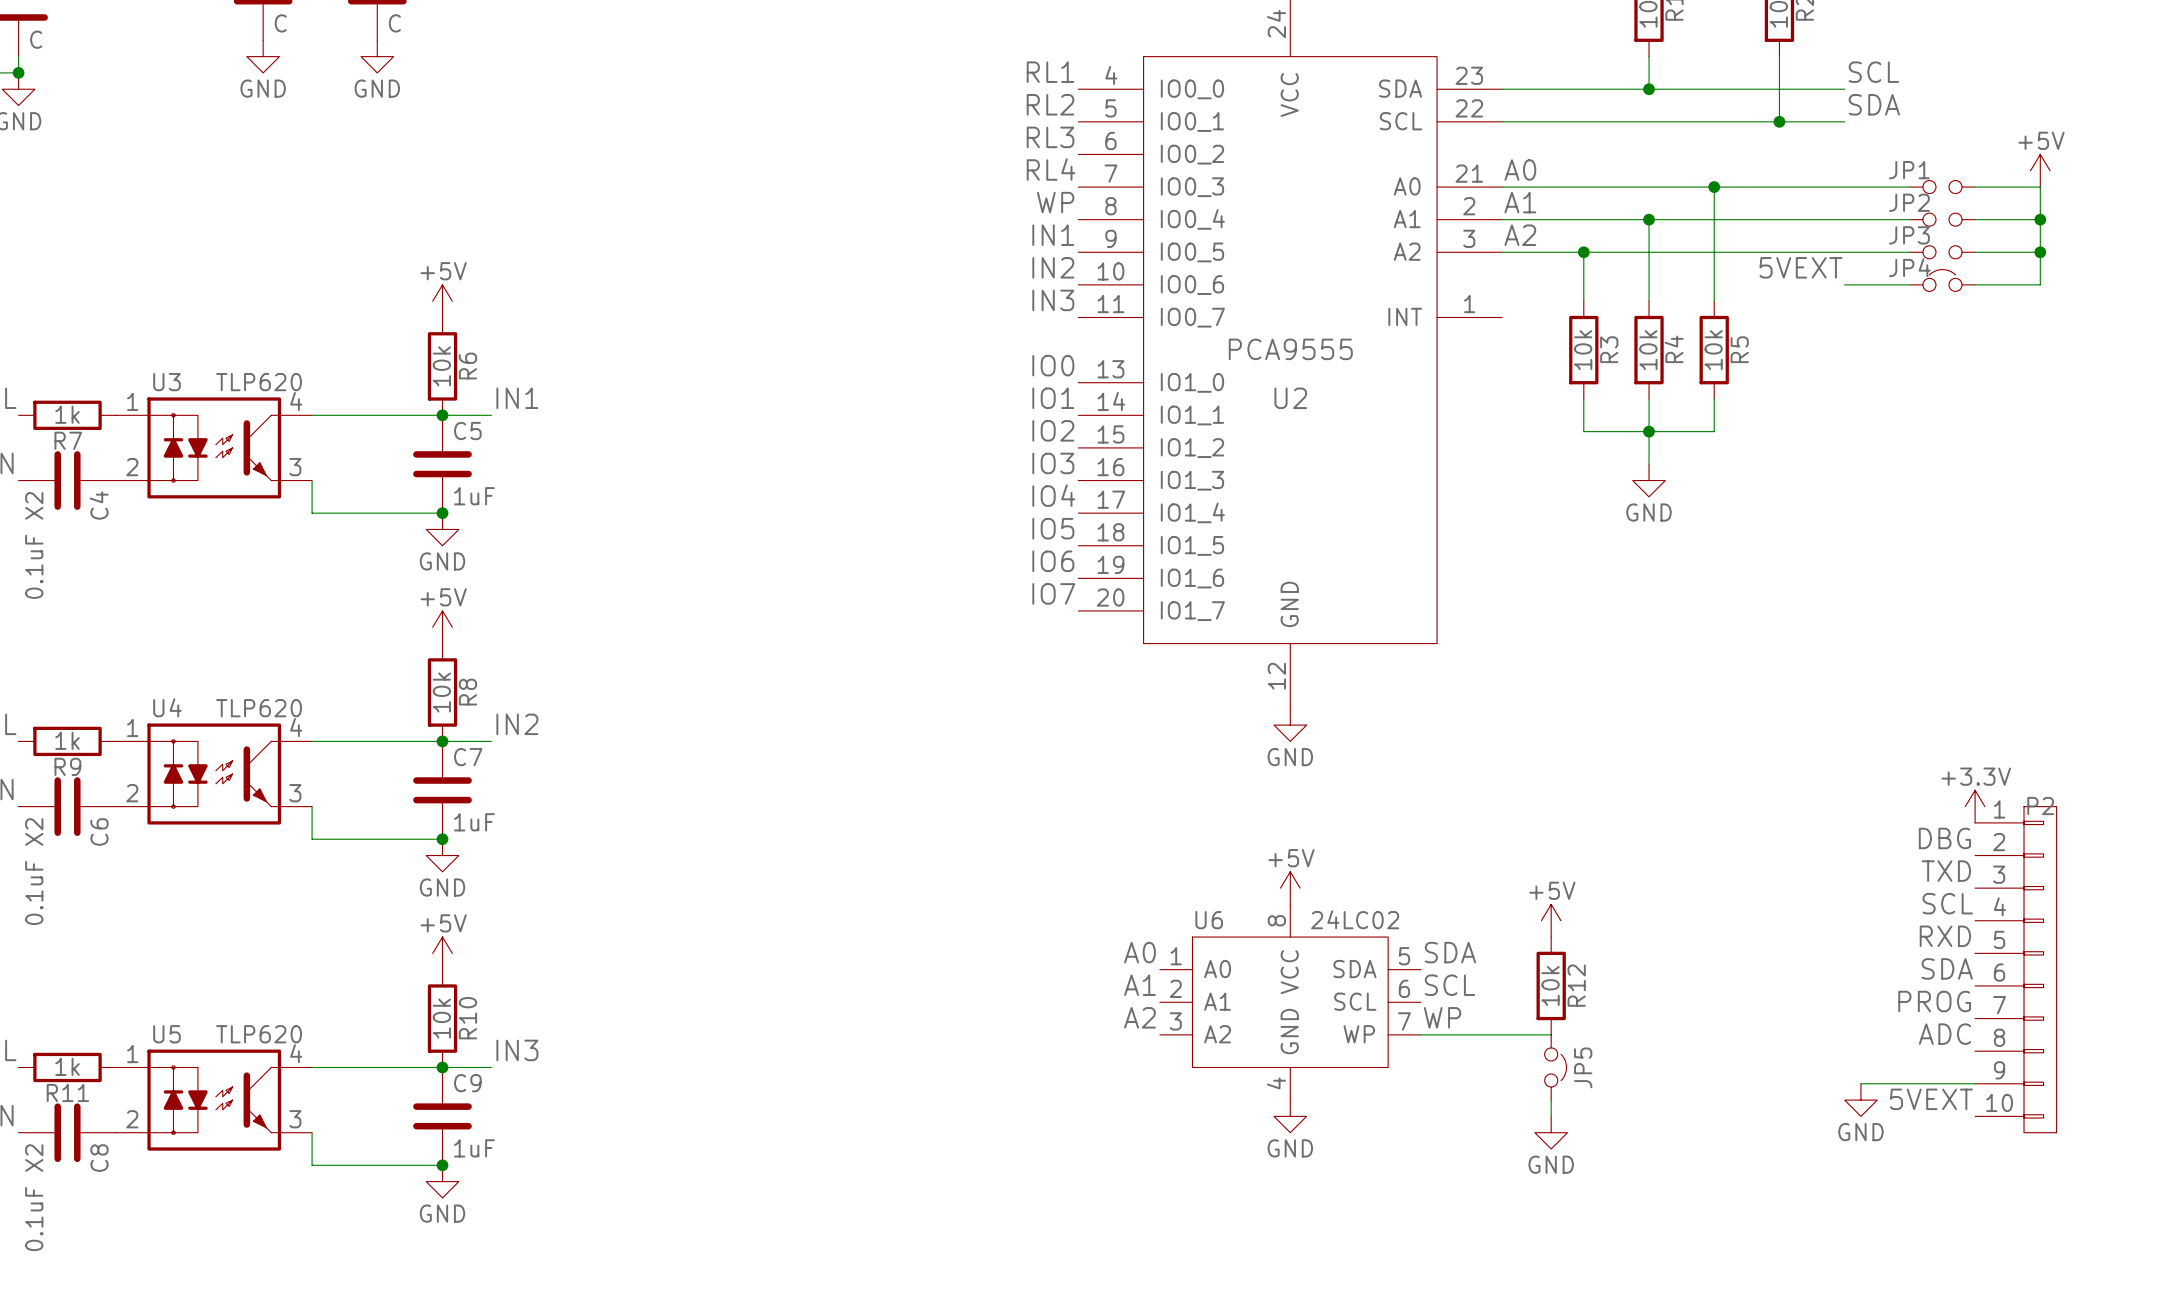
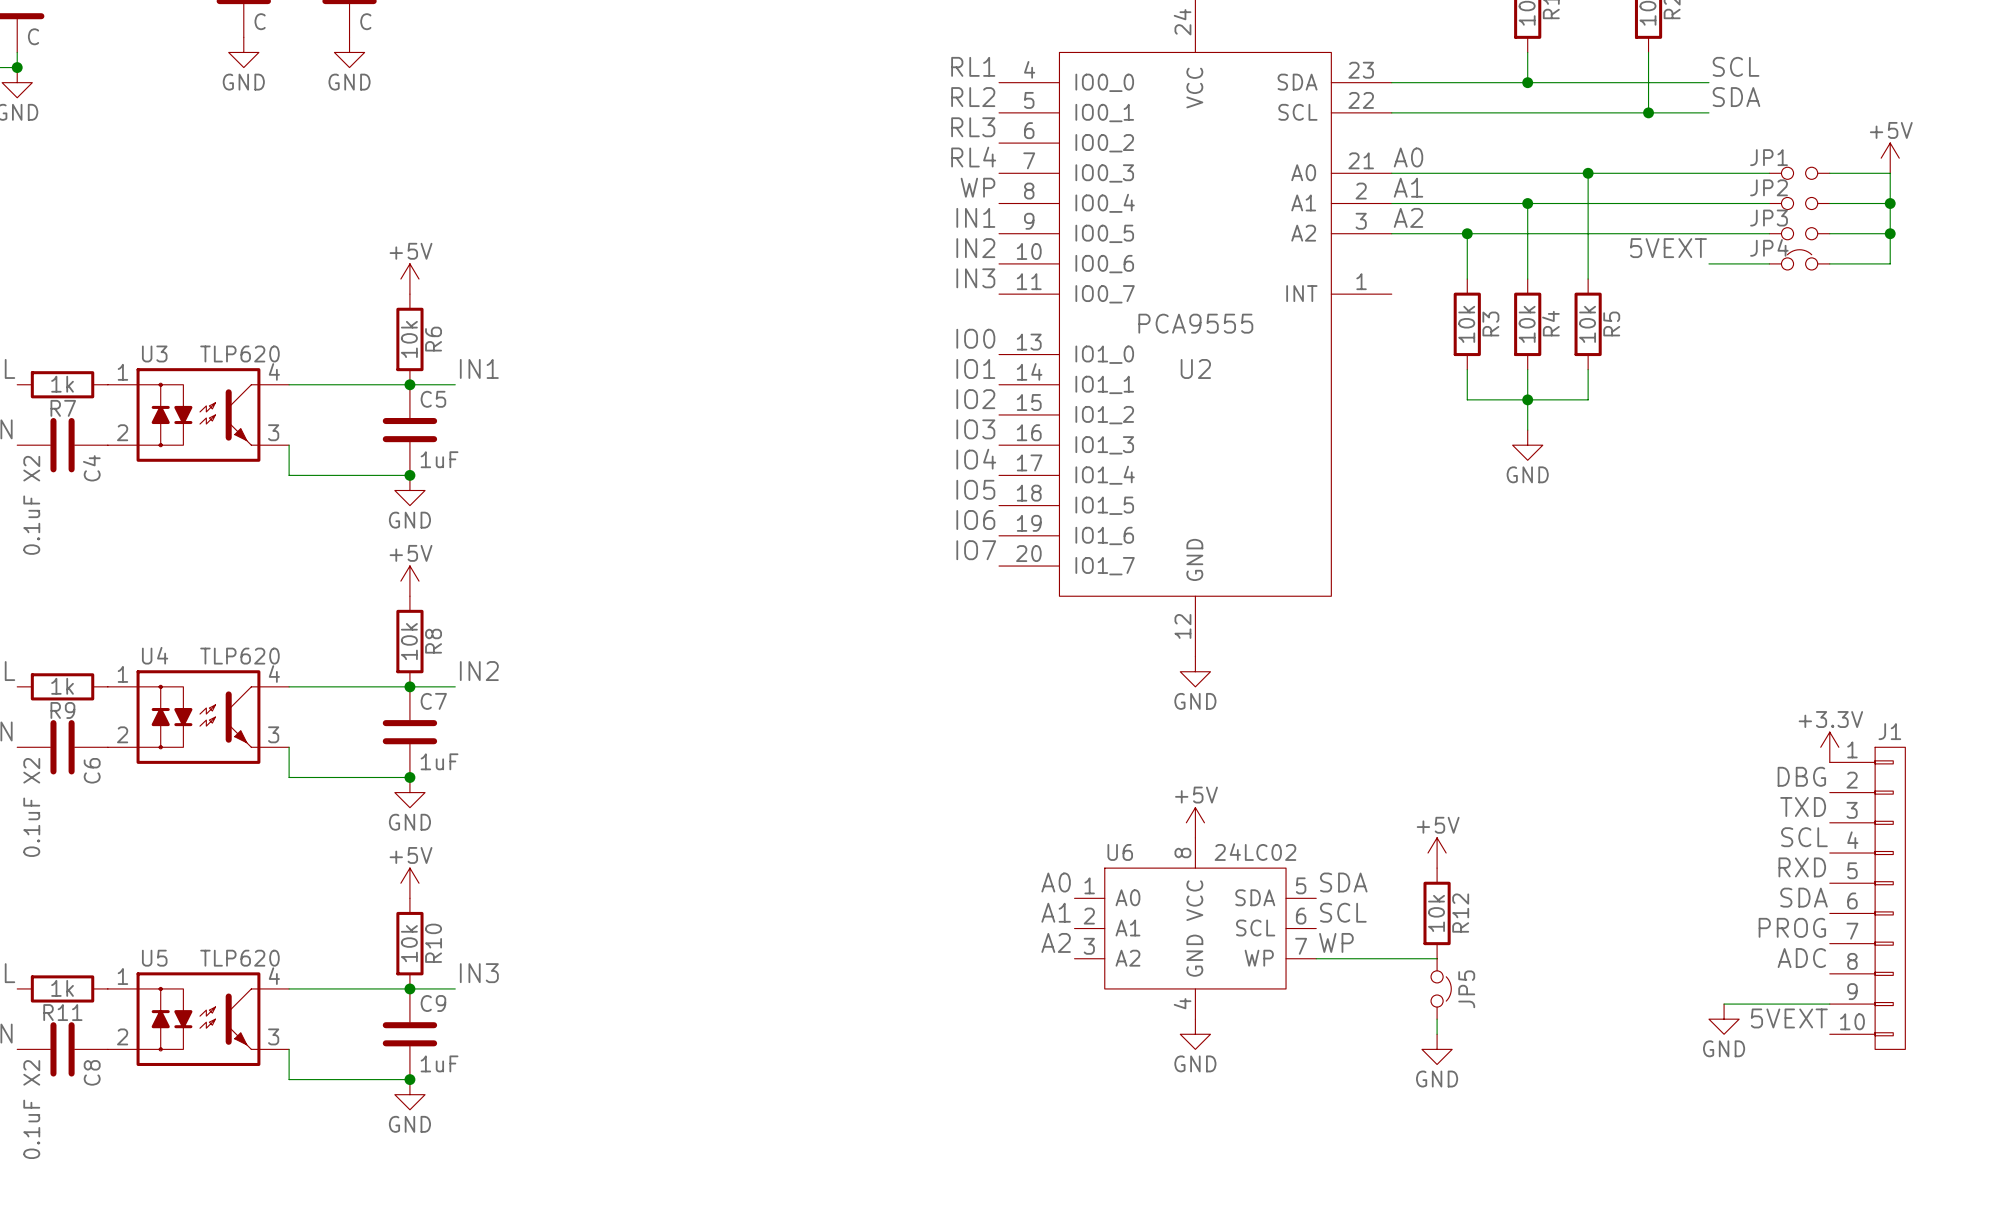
P2 name: P2 (2040, 806) -> J1 (1889, 731)

